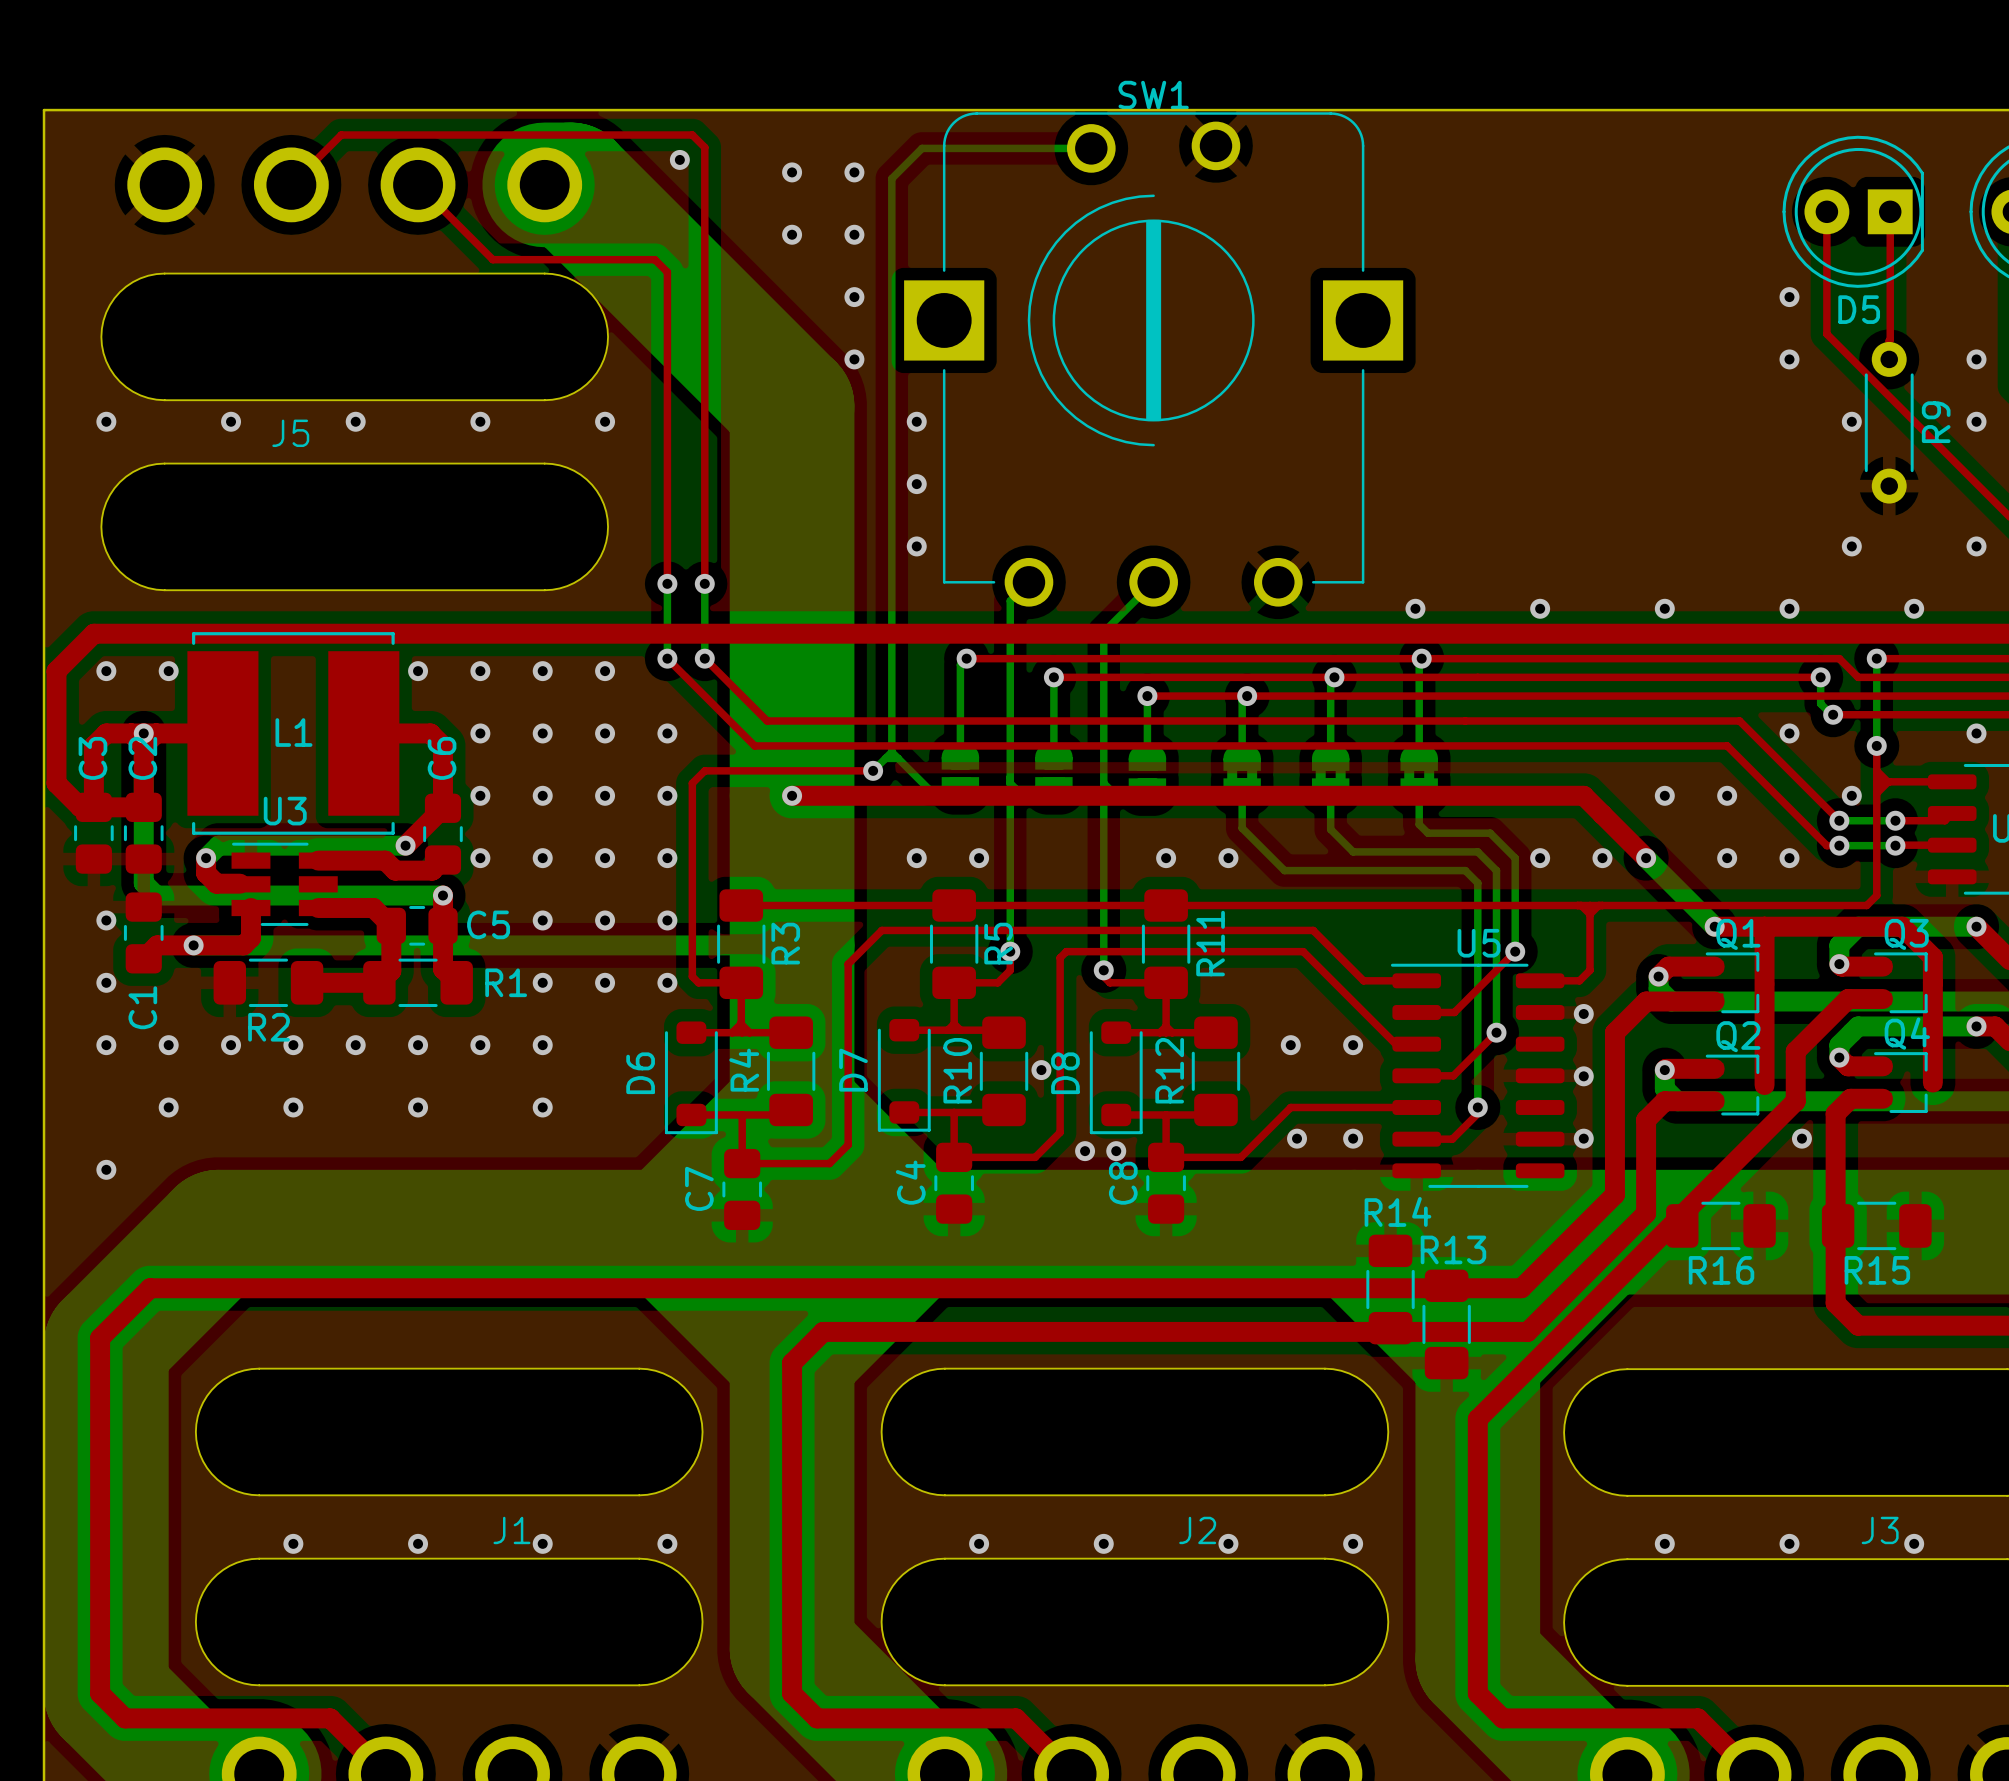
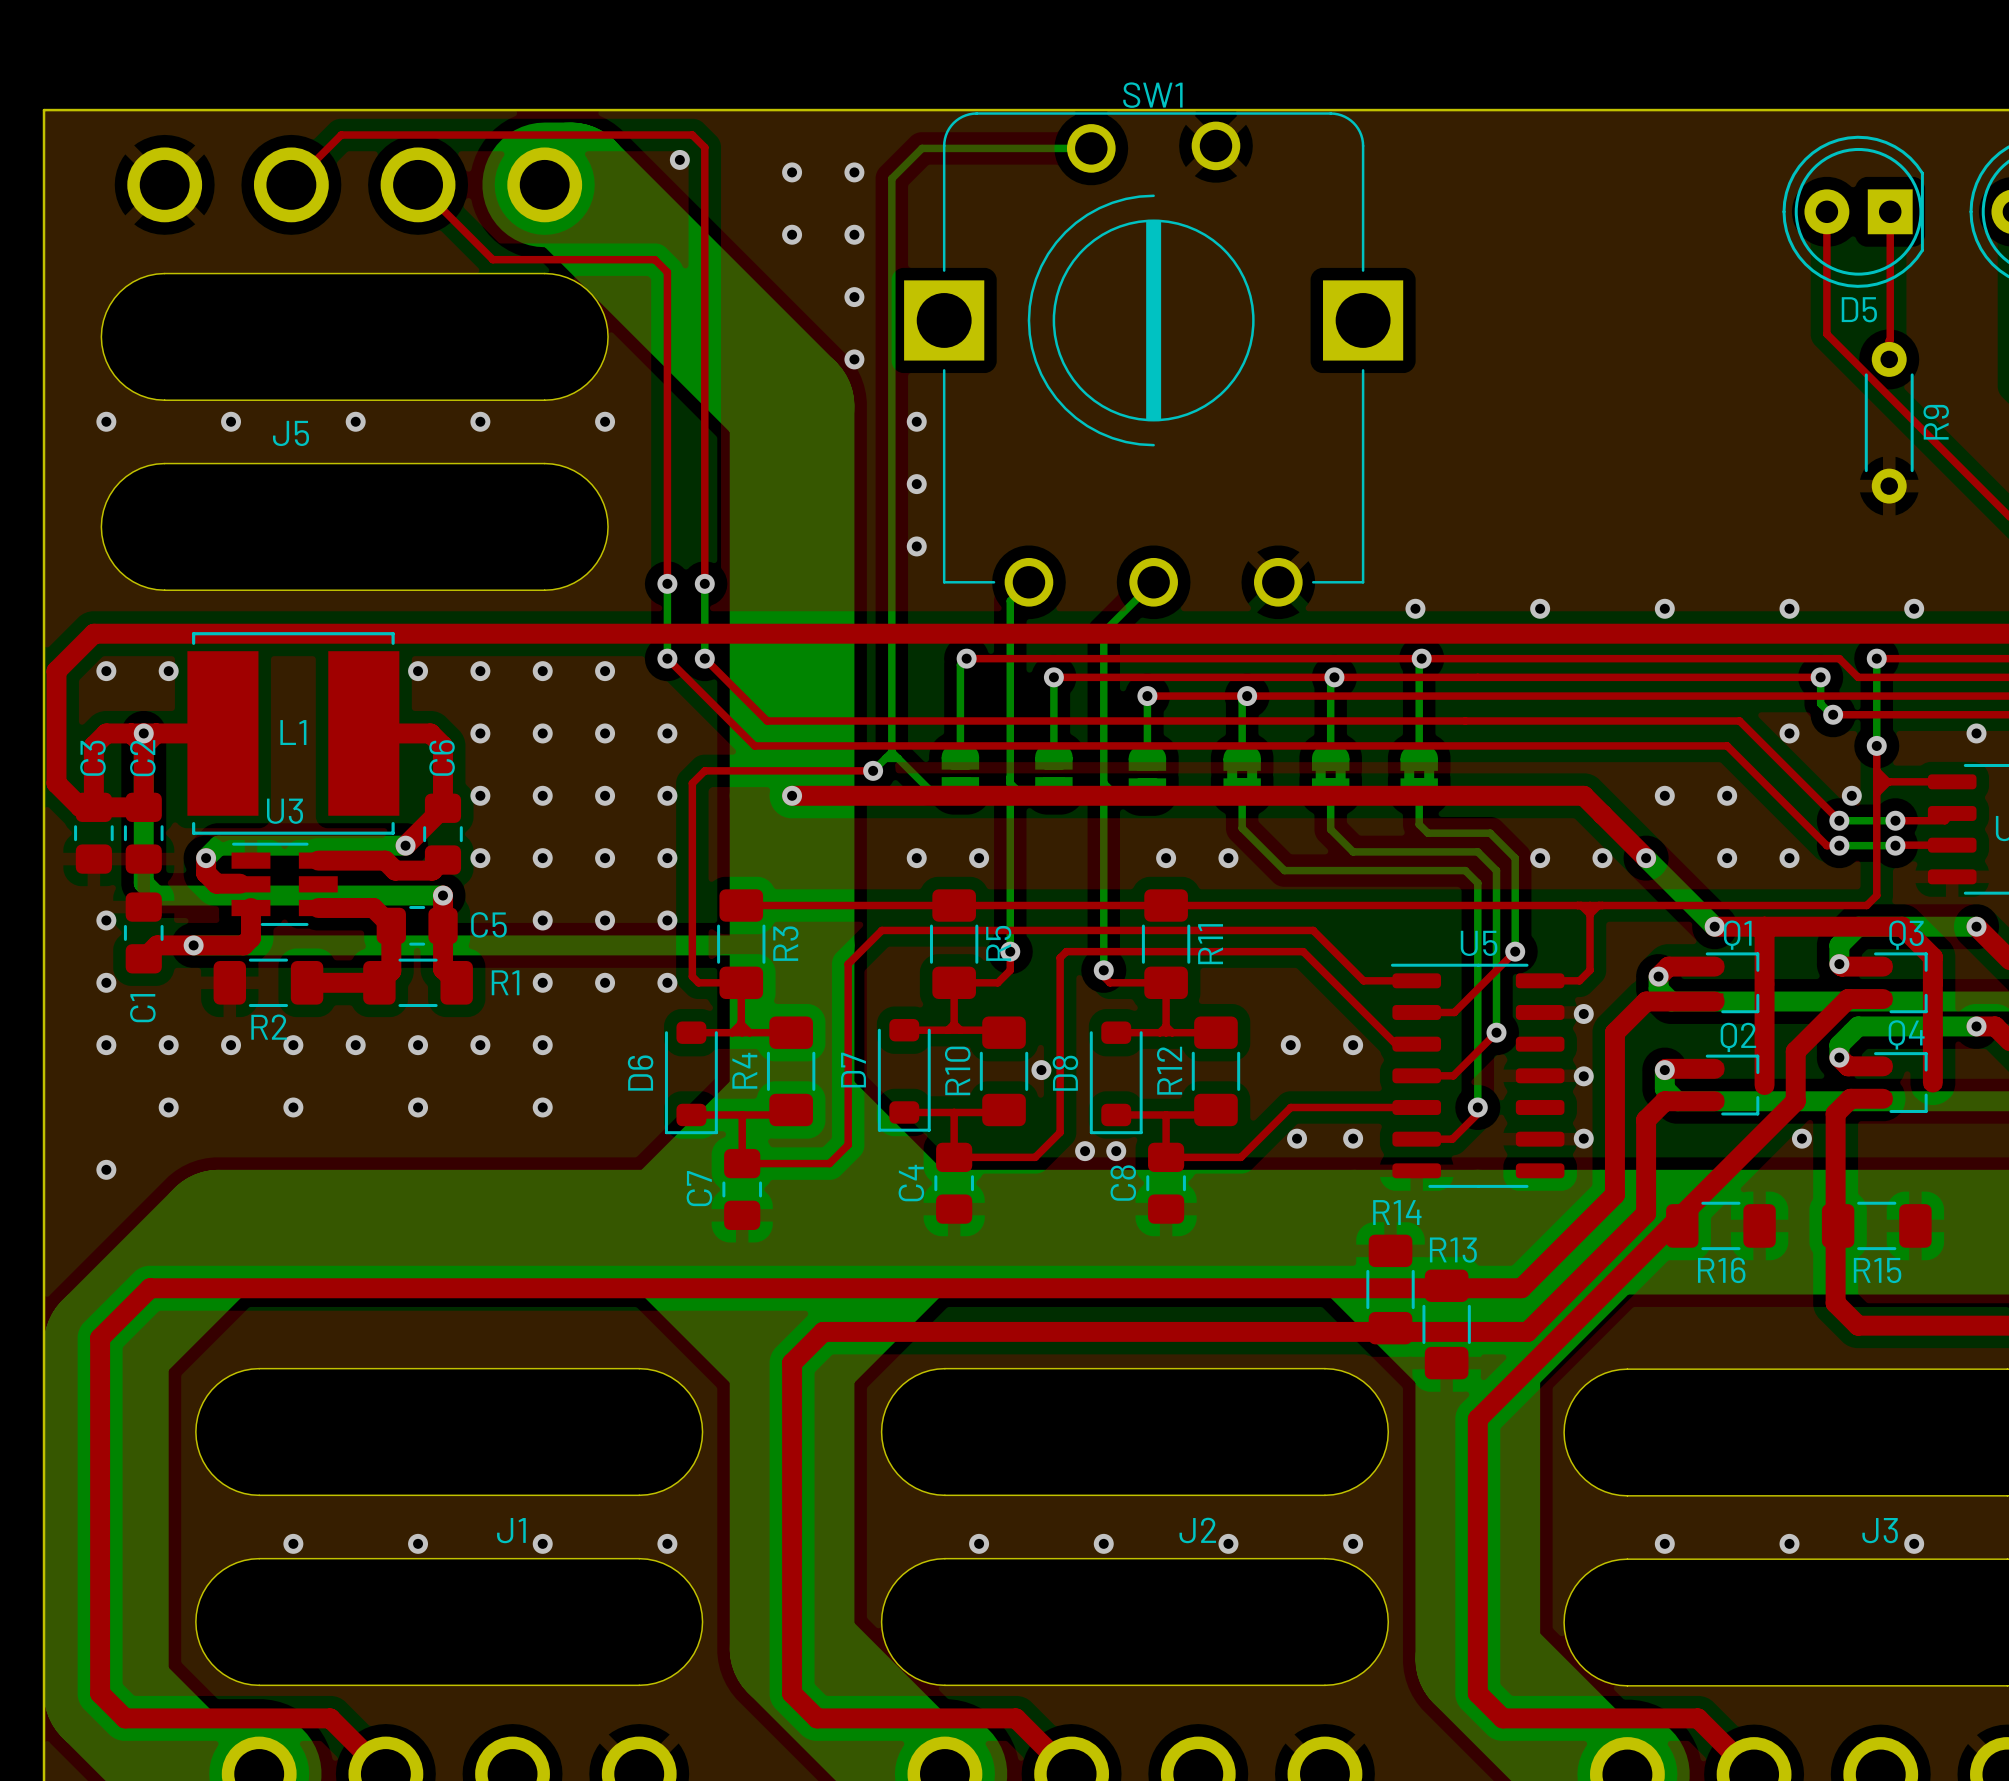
via: (1789, 297) -> none
via: (1789, 359) -> none
via: (1976, 359) -> none
via: (1851, 421) -> none
via: (1976, 421) -> none
via: (1851, 546) -> none
via: (1976, 546) -> none

